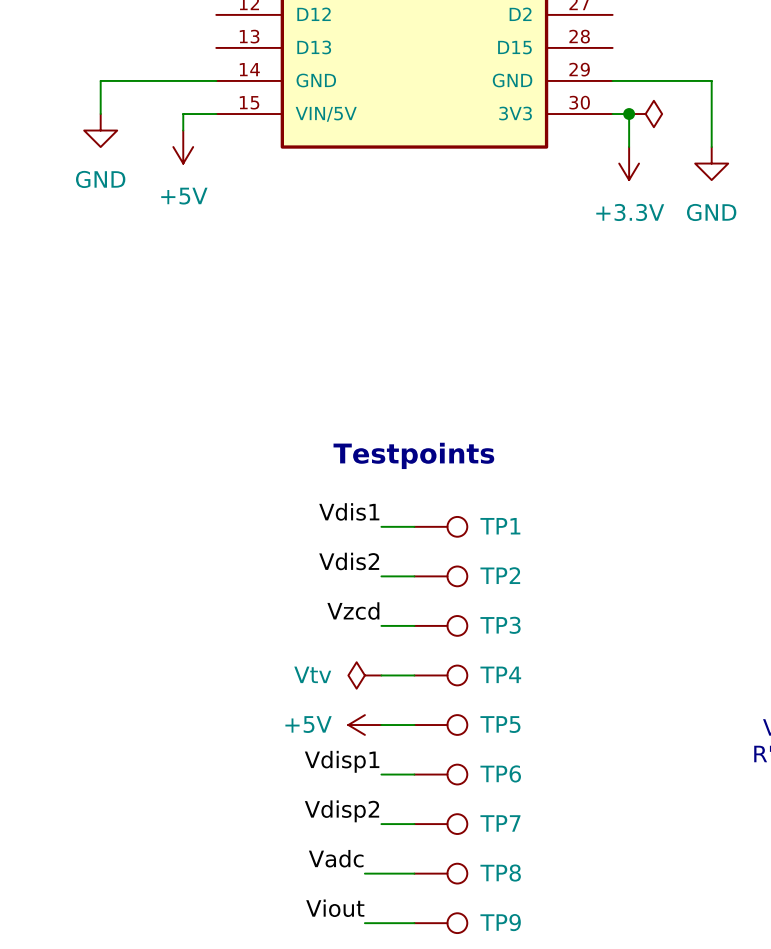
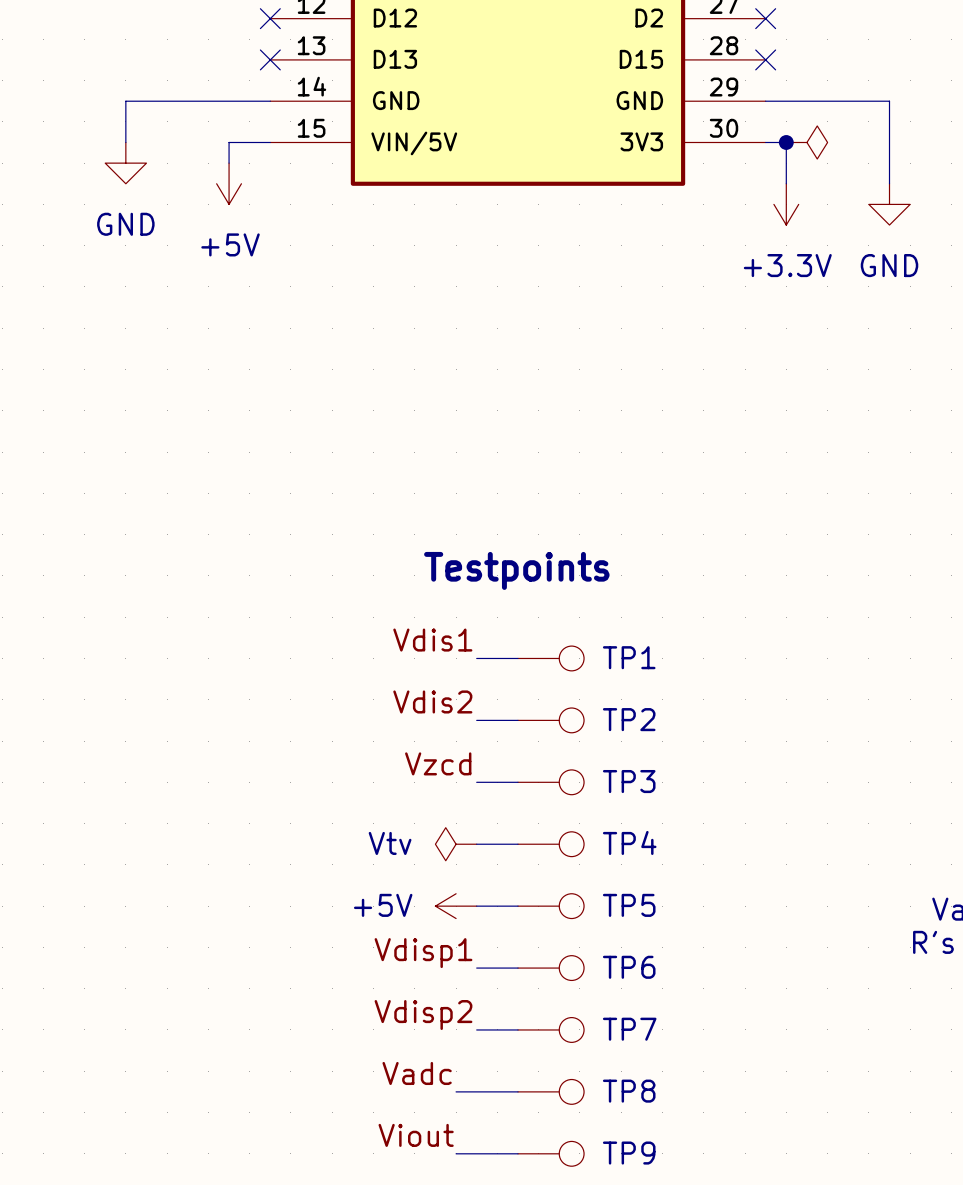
no-connect mark: none -> (270, 18)
no-connect mark: none -> (765, 18)
no-connect mark: none -> (270, 59)
no-connect mark: none -> (765, 59)

